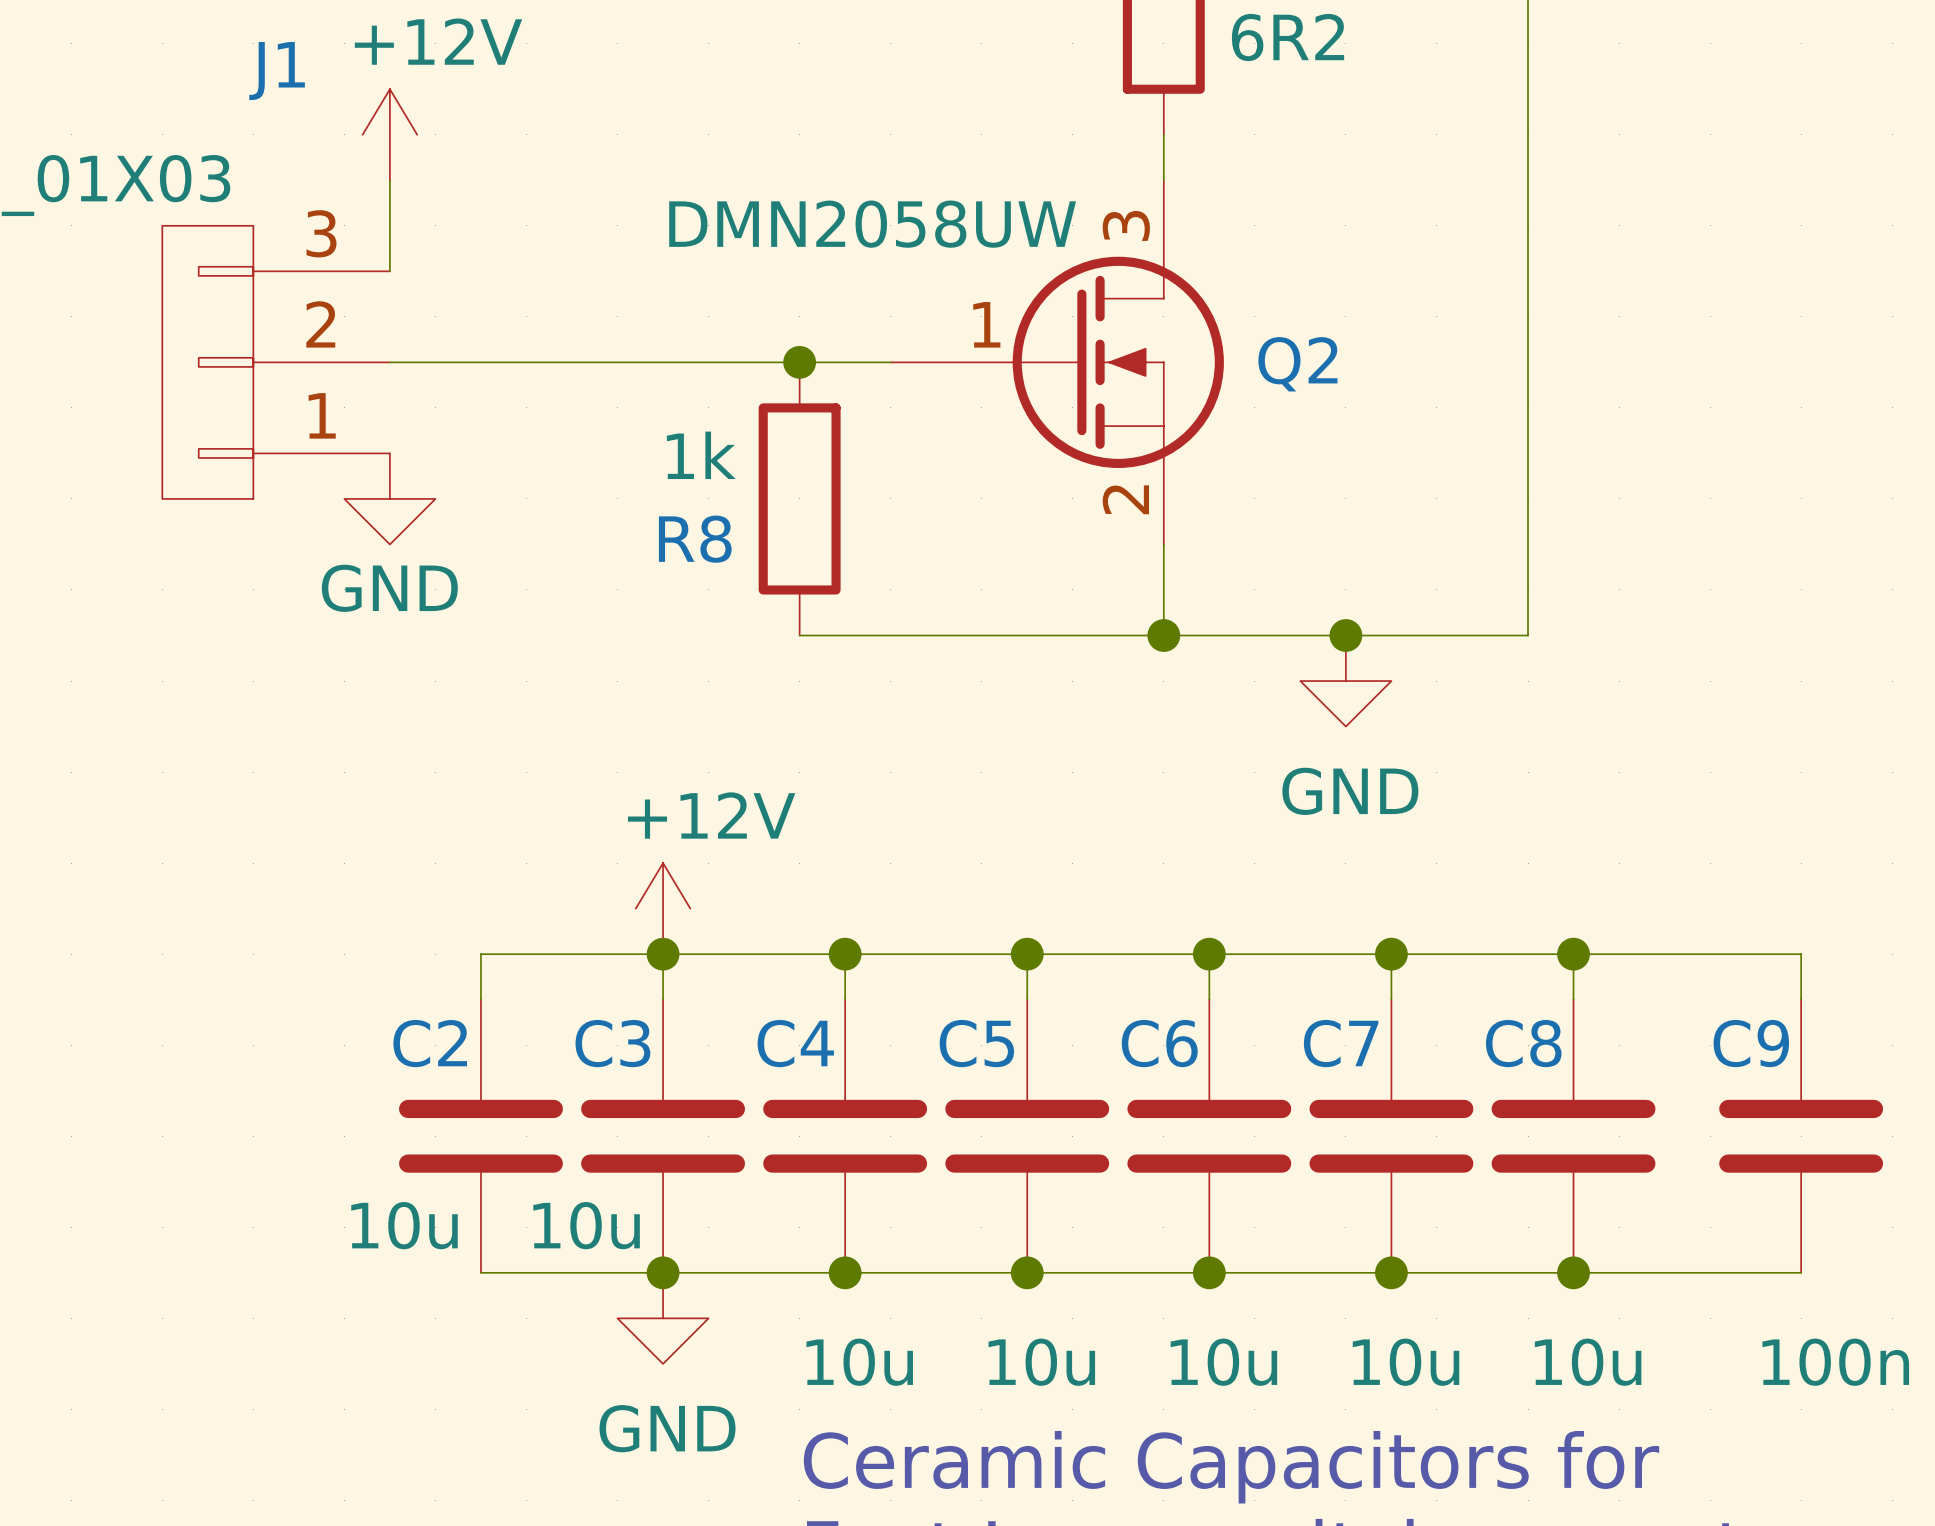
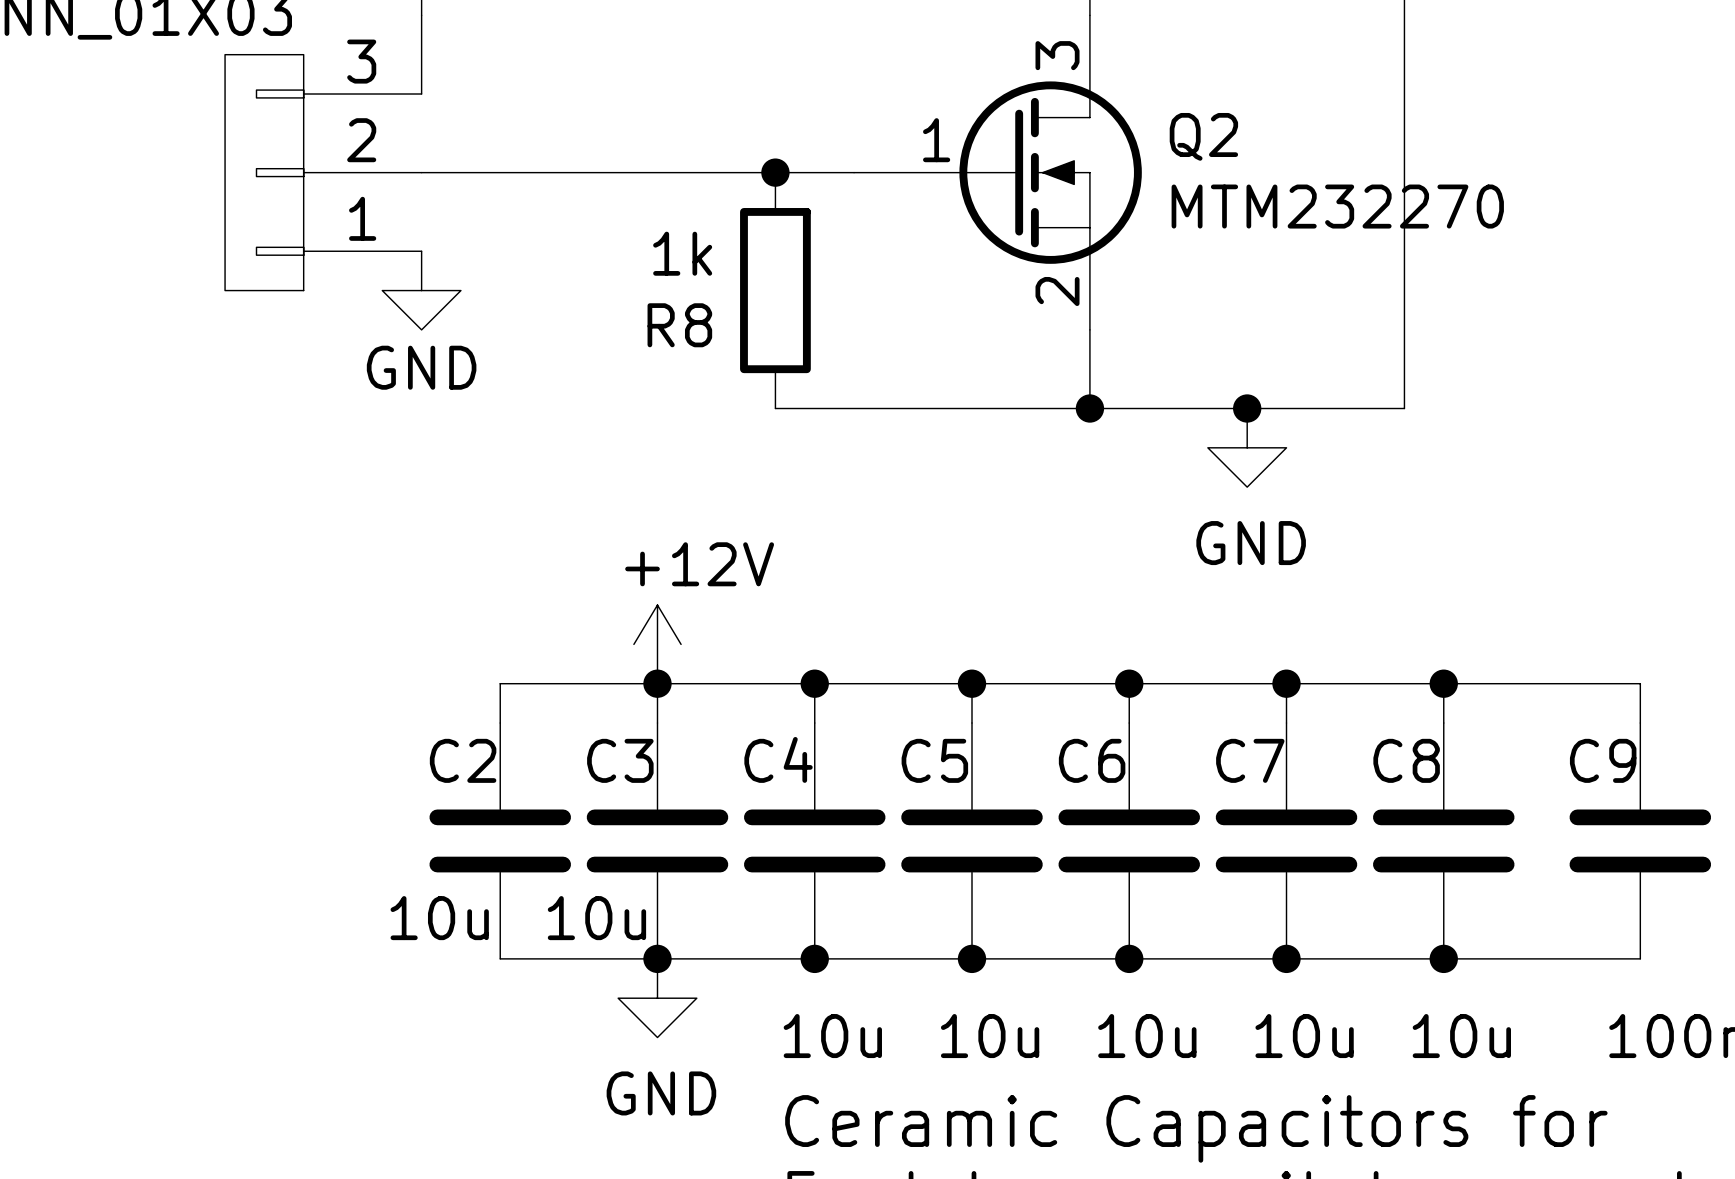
Q2 value: DMN2058UW (872, 224) -> MTM232270 (1337, 206)
Q2 name position: Q2 (1297, 364) -> Q2 (1203, 136)

